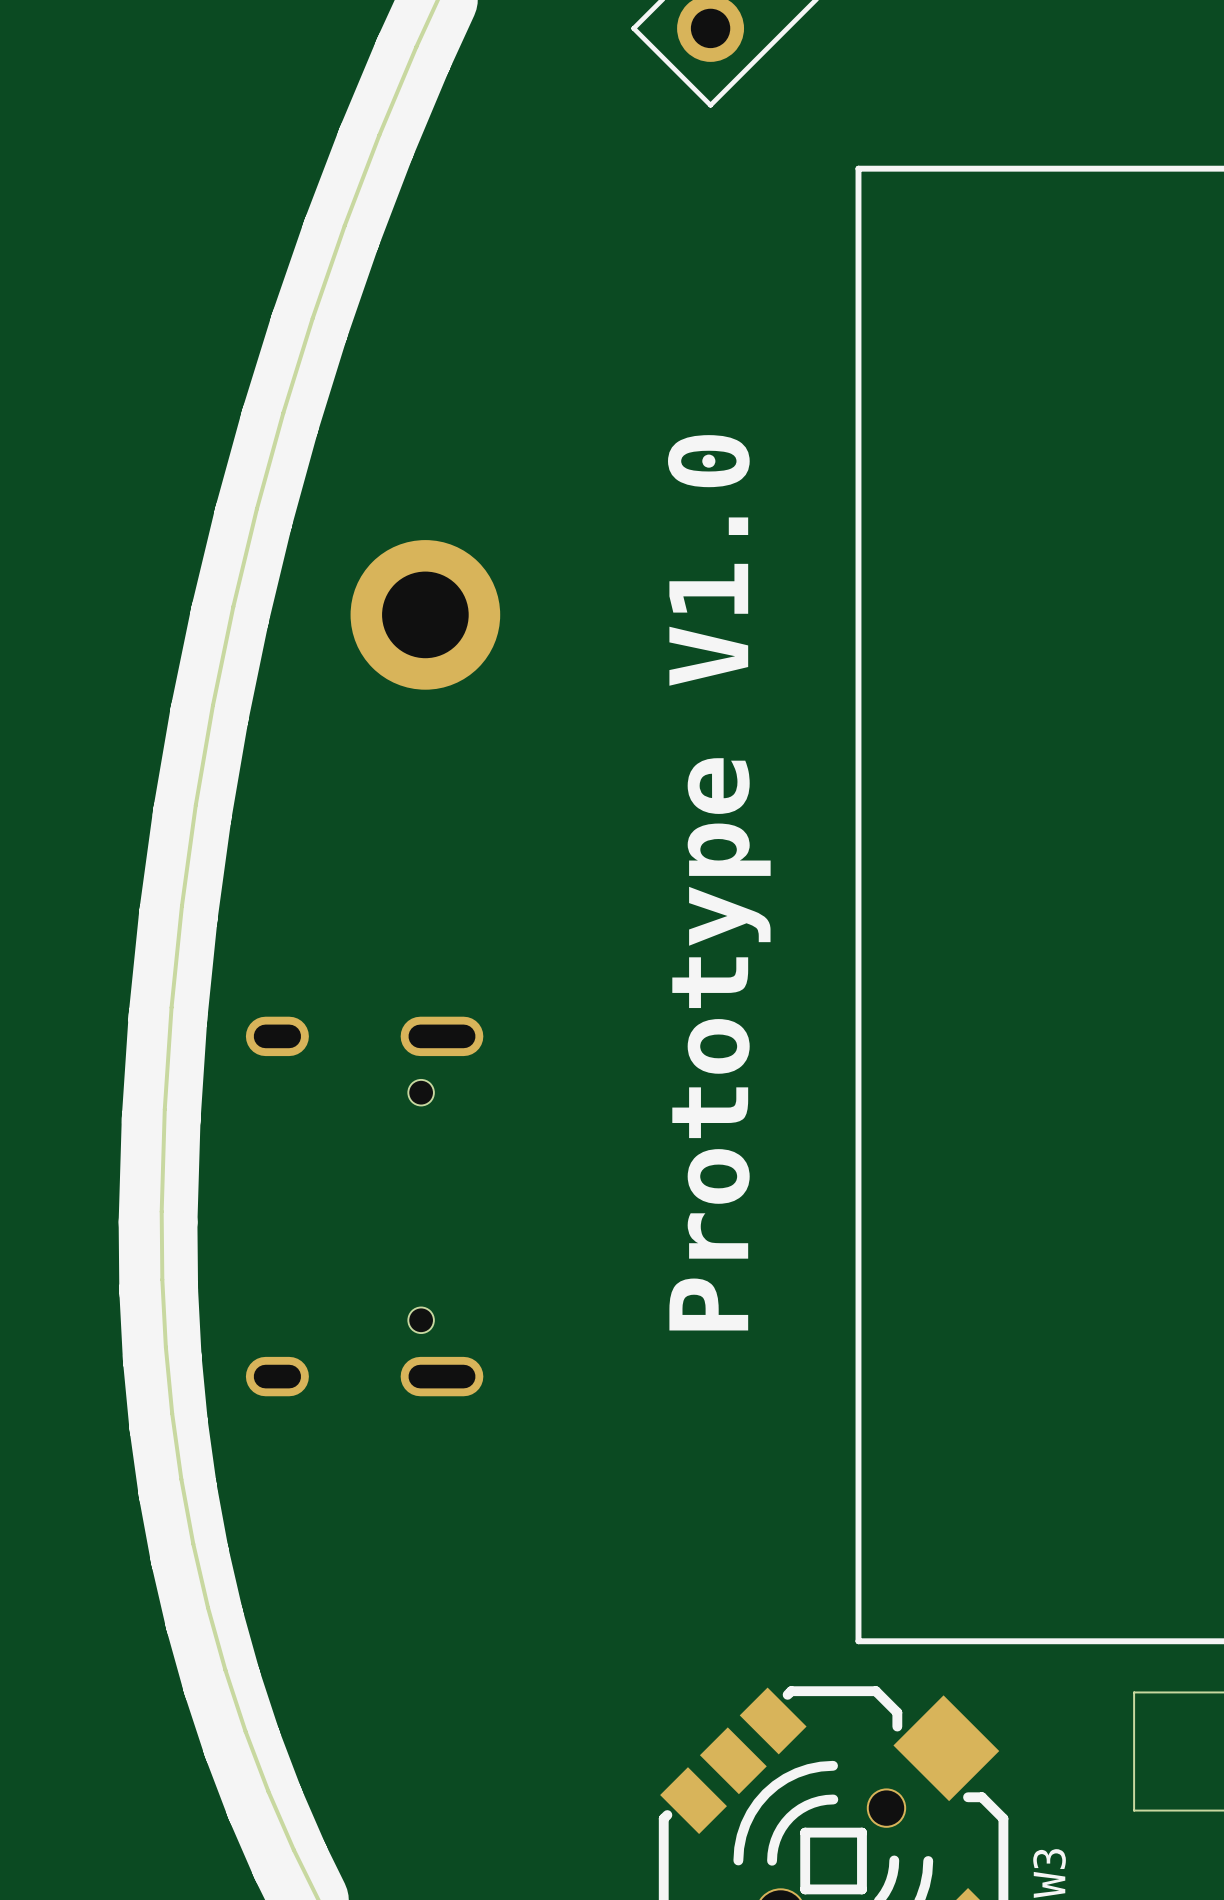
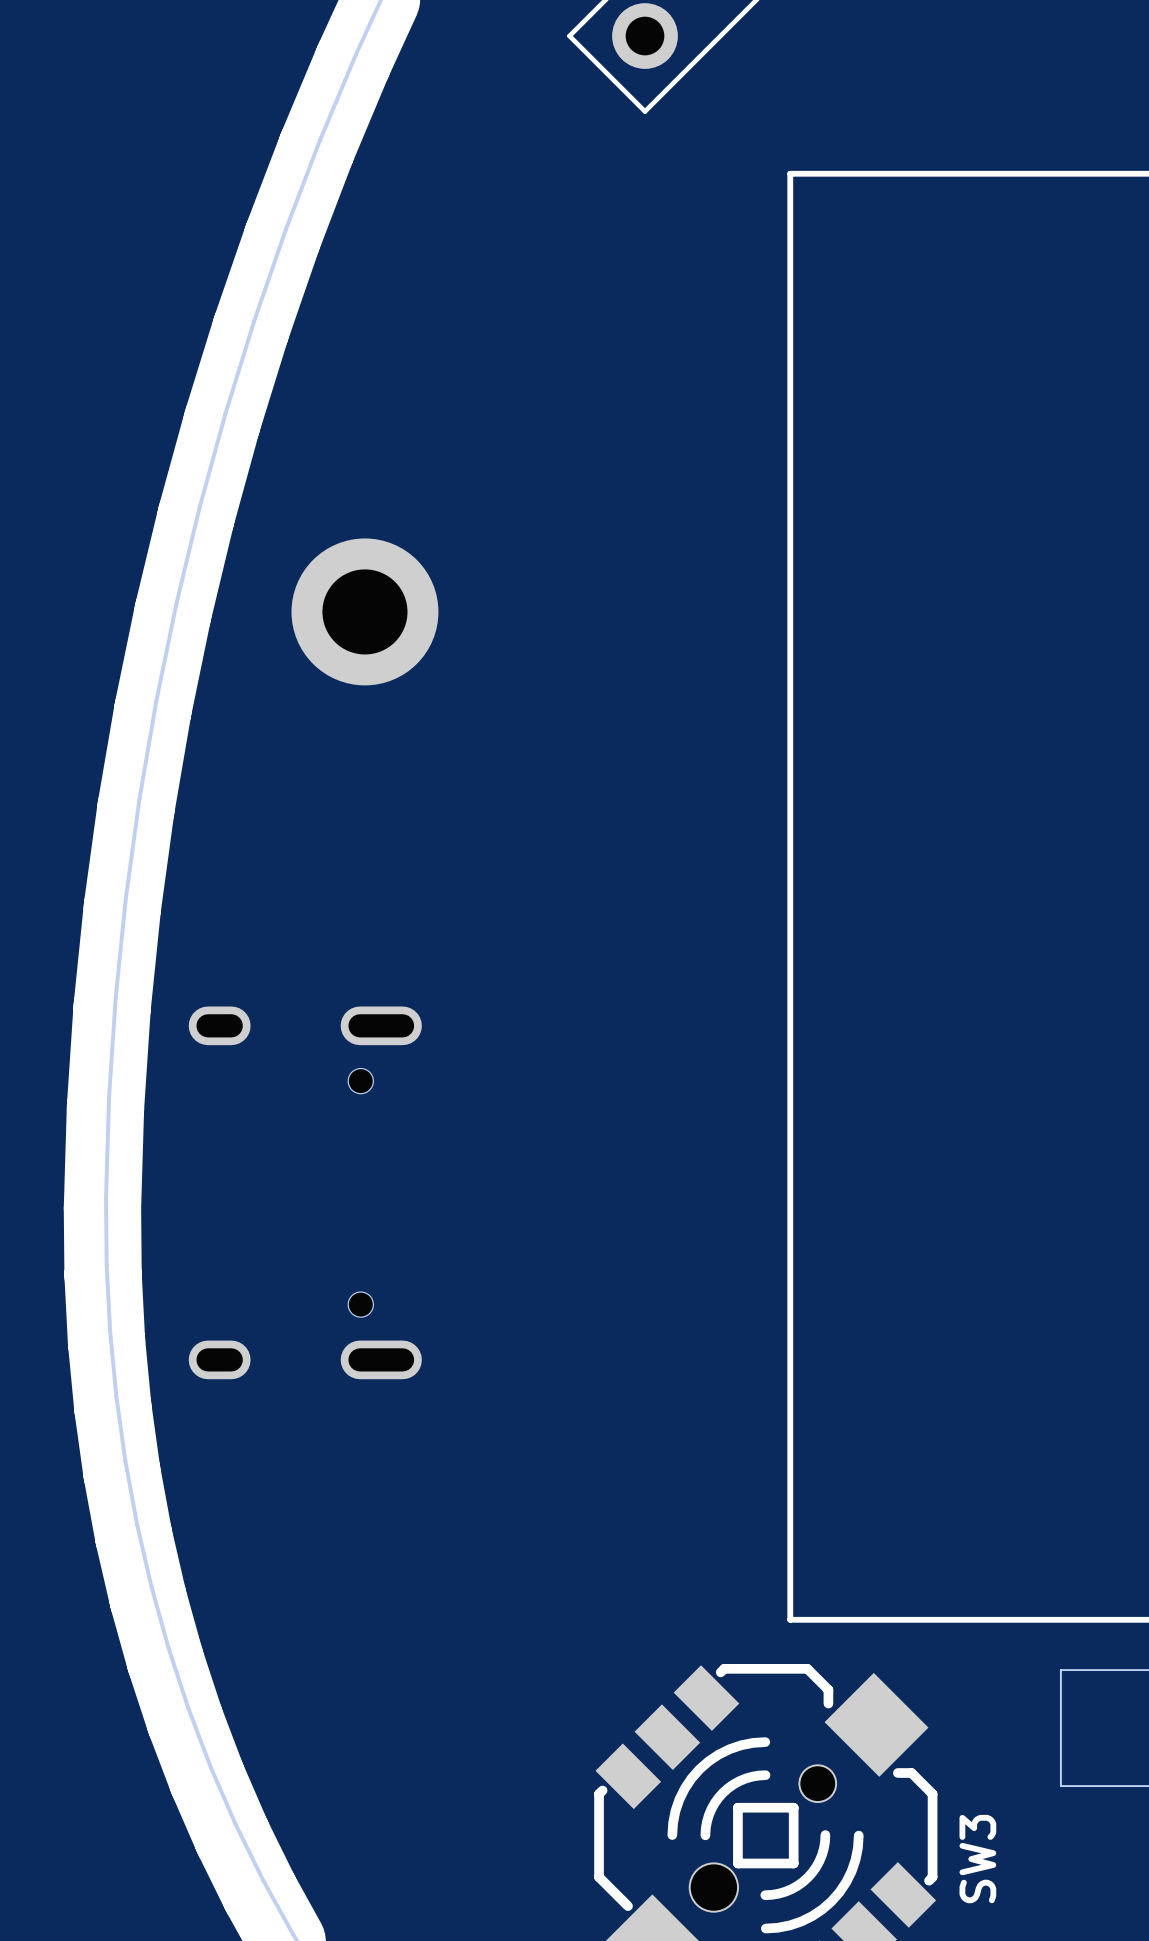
text: Prototype V1.0 (719, 882) -> none

